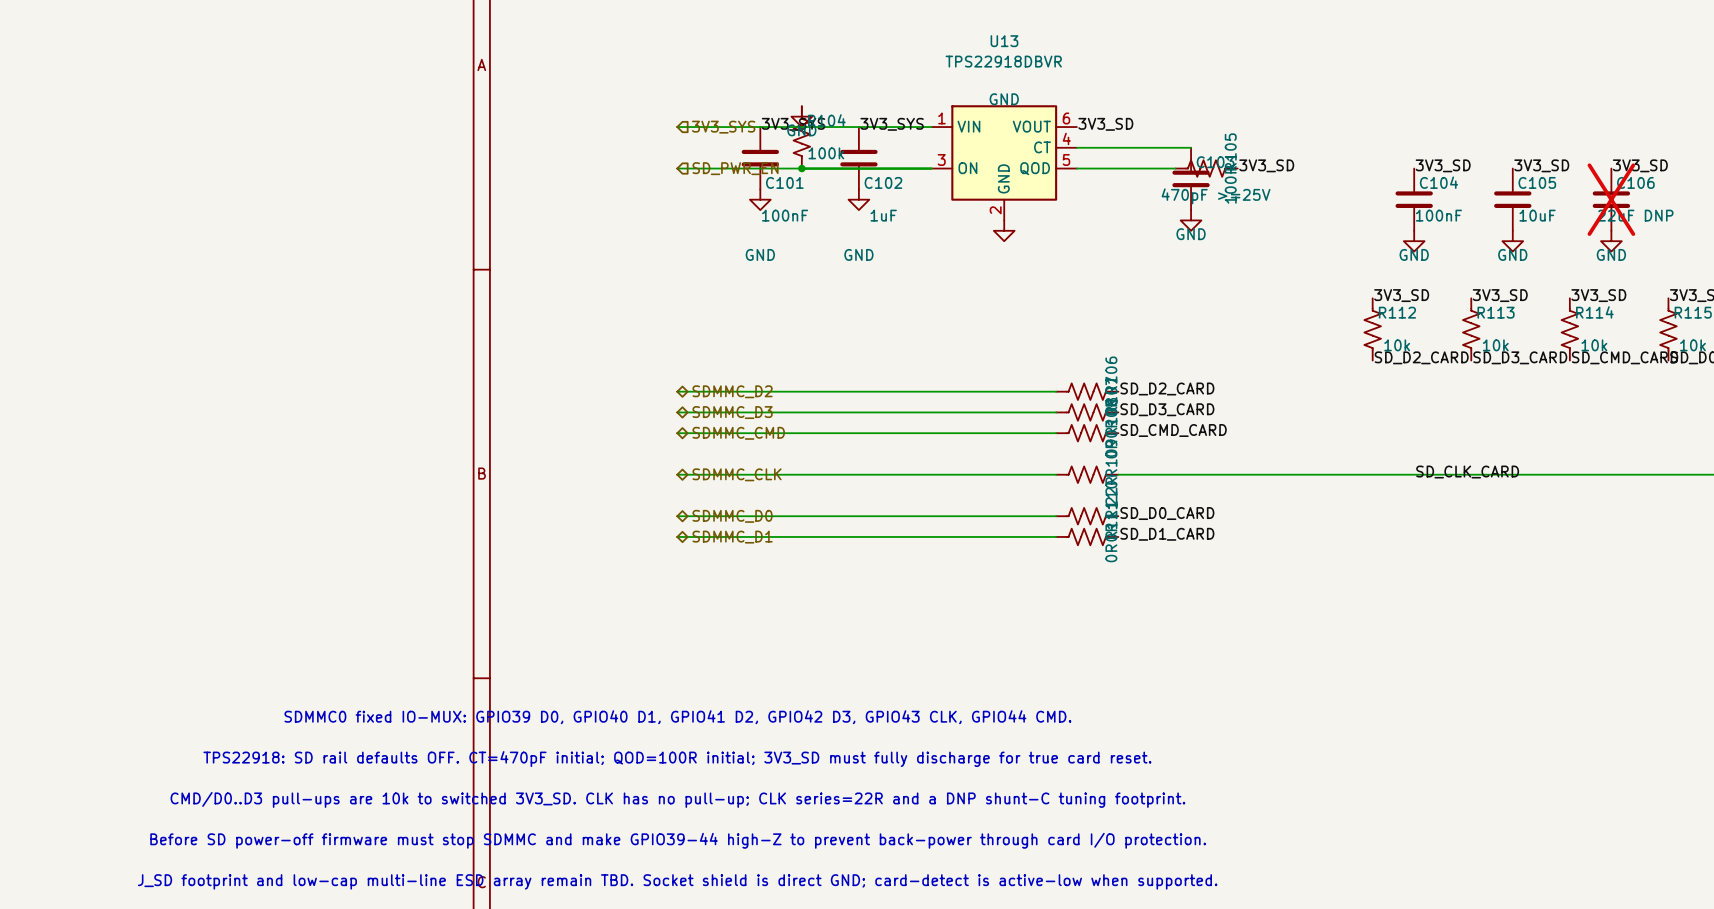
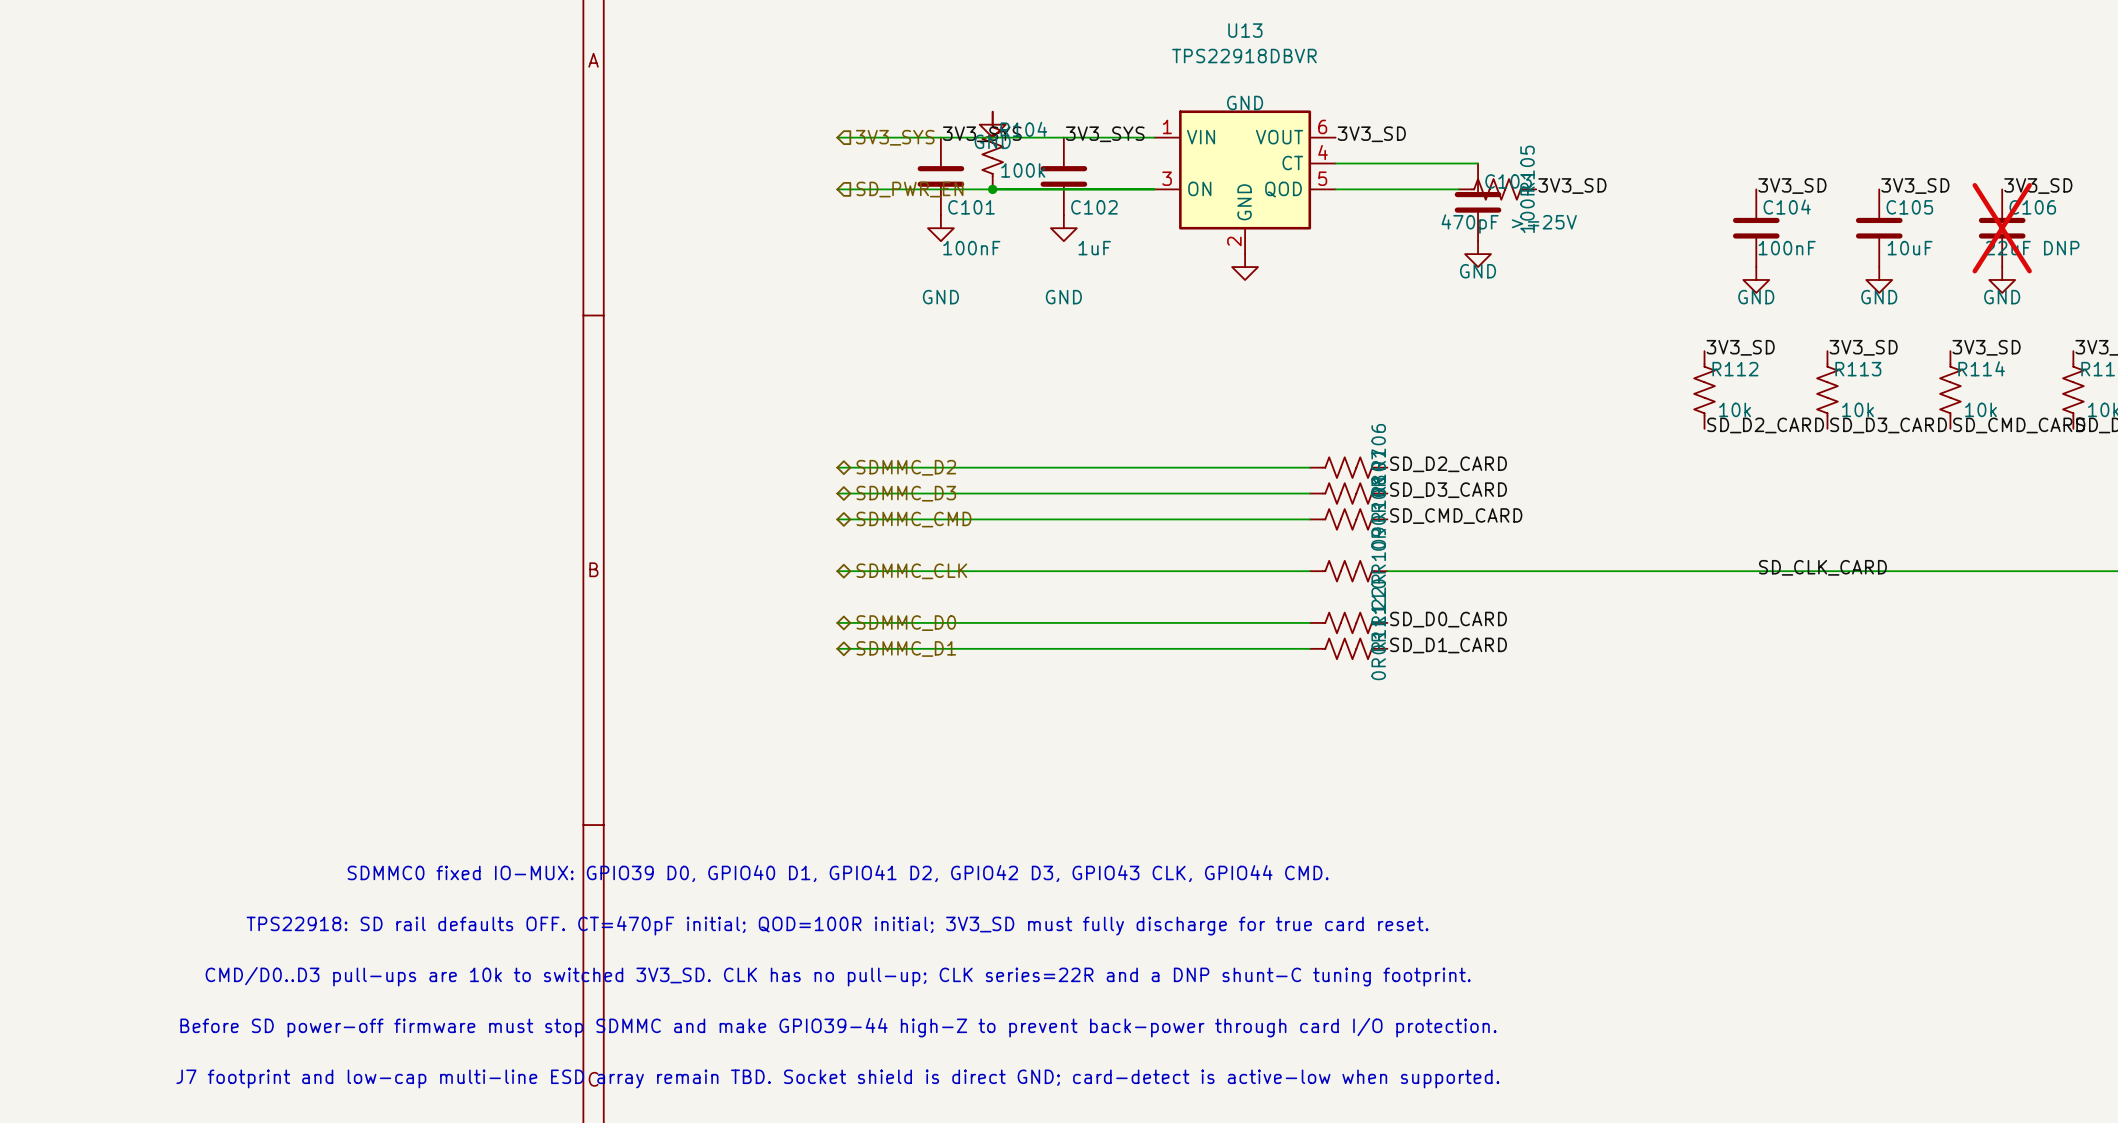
text: J_SD footprint and low-cap multi-line ESD array remain TBD. Socket shield is direct GND; card-detect is active-low when supported. (677, 881) -> J7 footprint and low-cap multi-line ESD array remain TBD. Socket shield is direct GND; card-detect is active-low when supported. (837, 1078)

